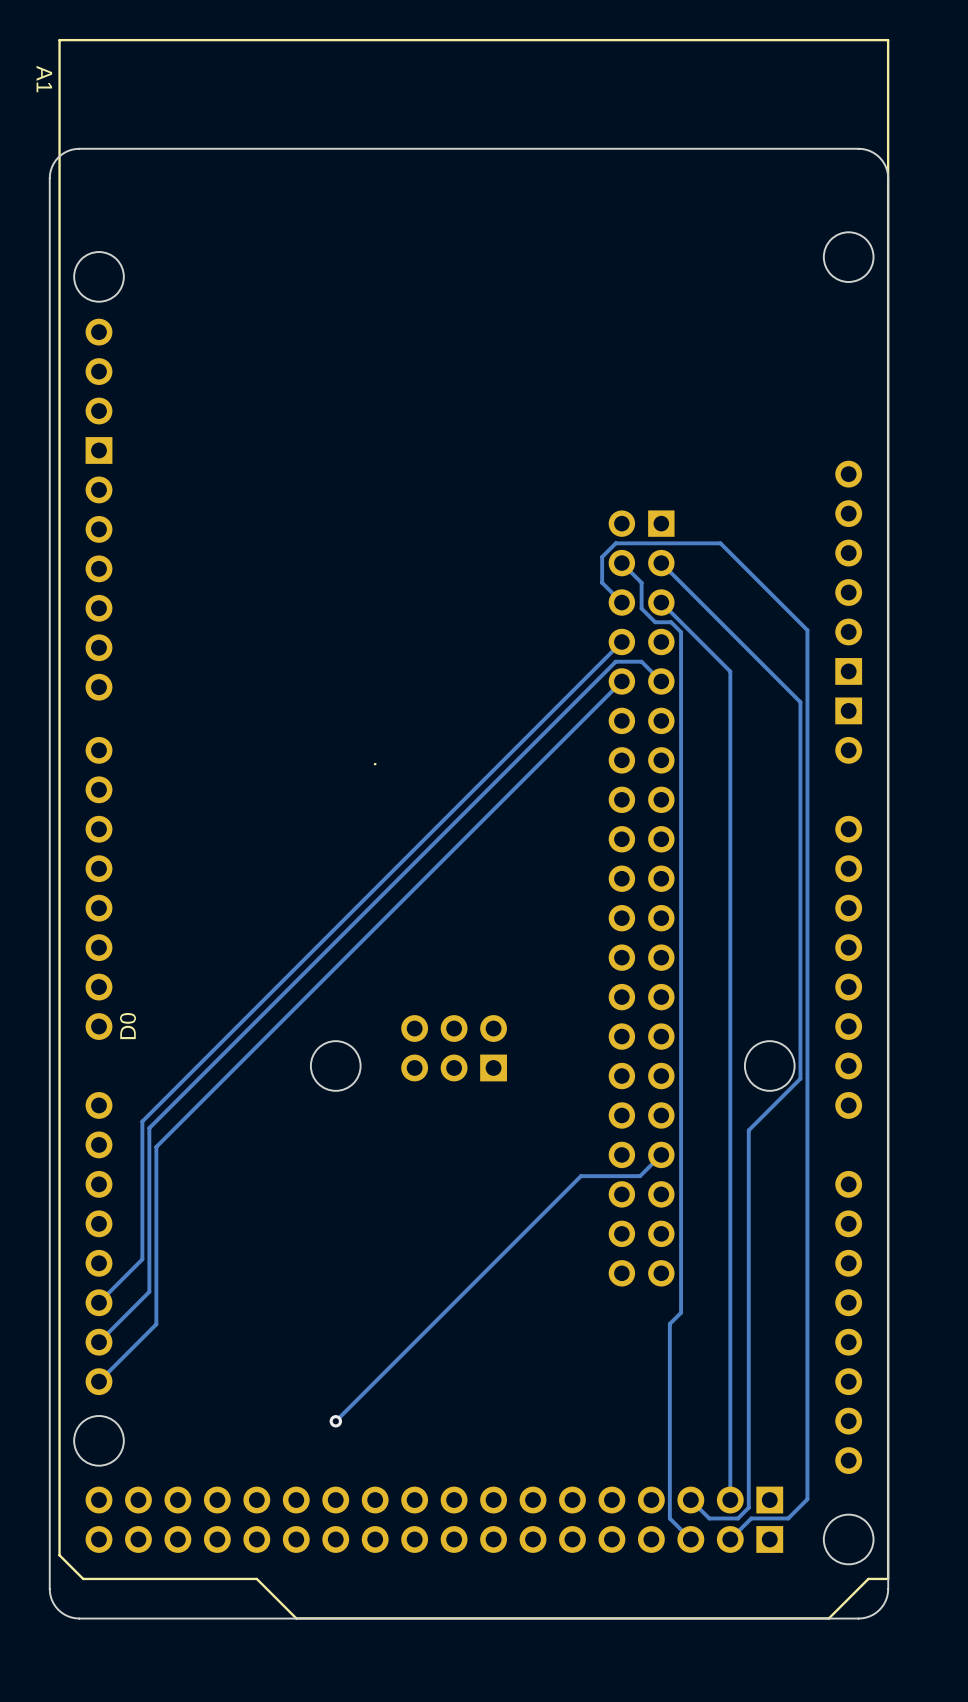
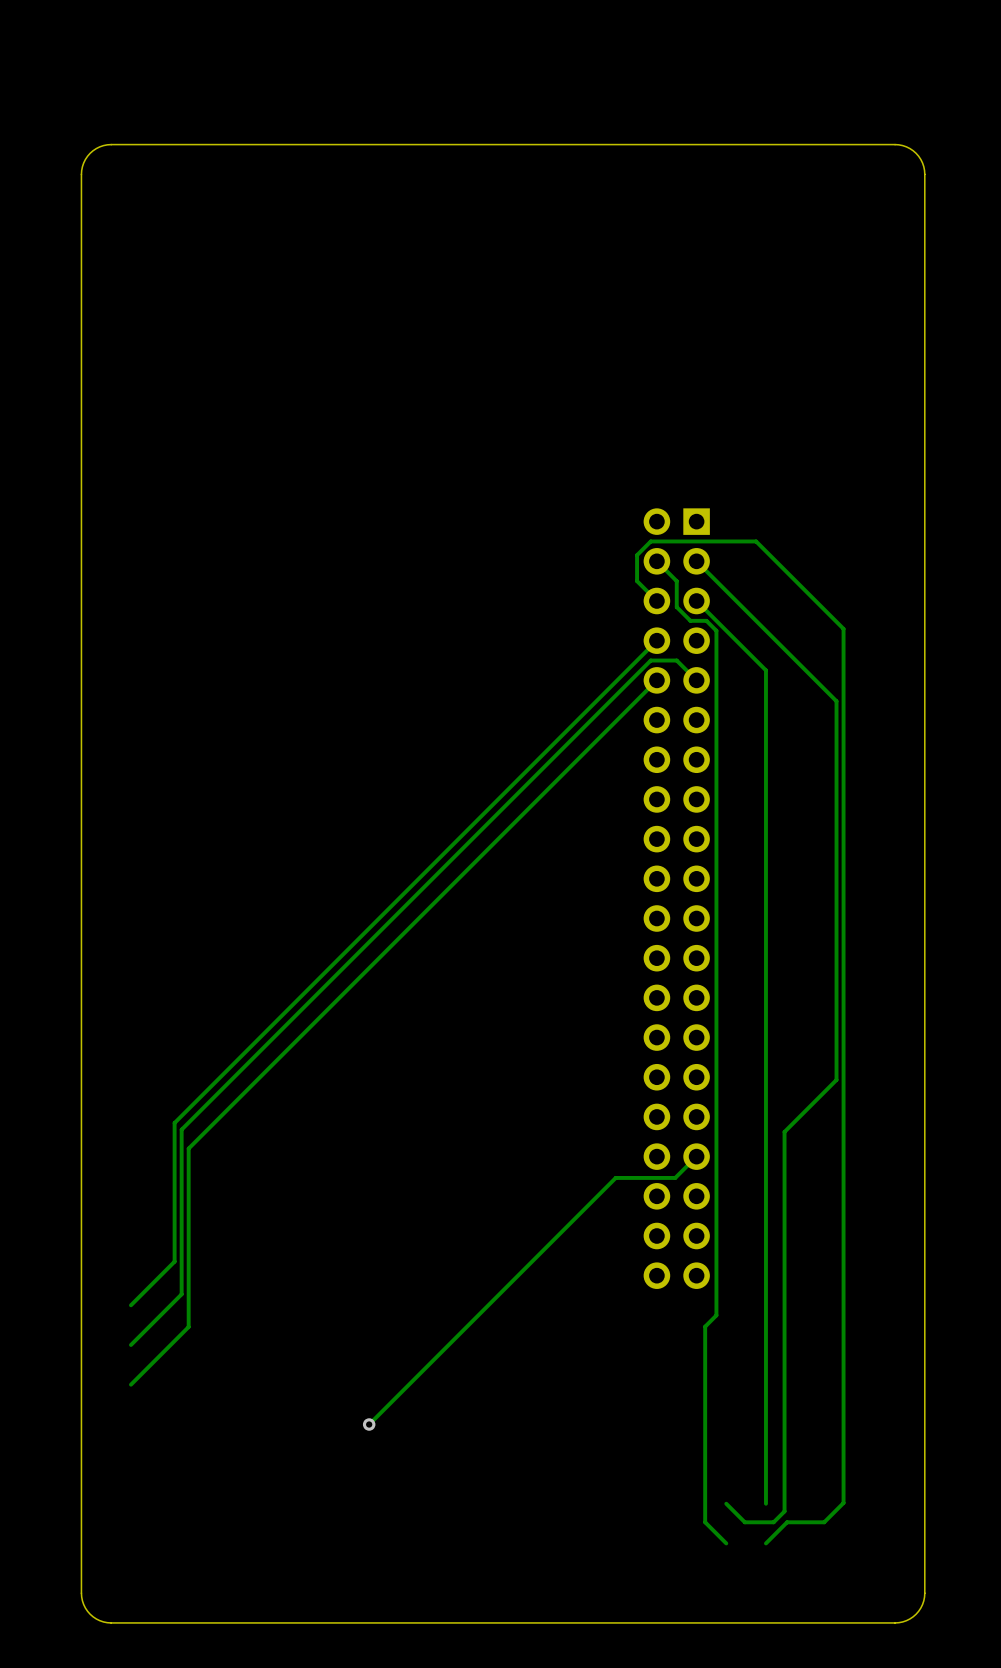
A1: (473, 829) -> none

